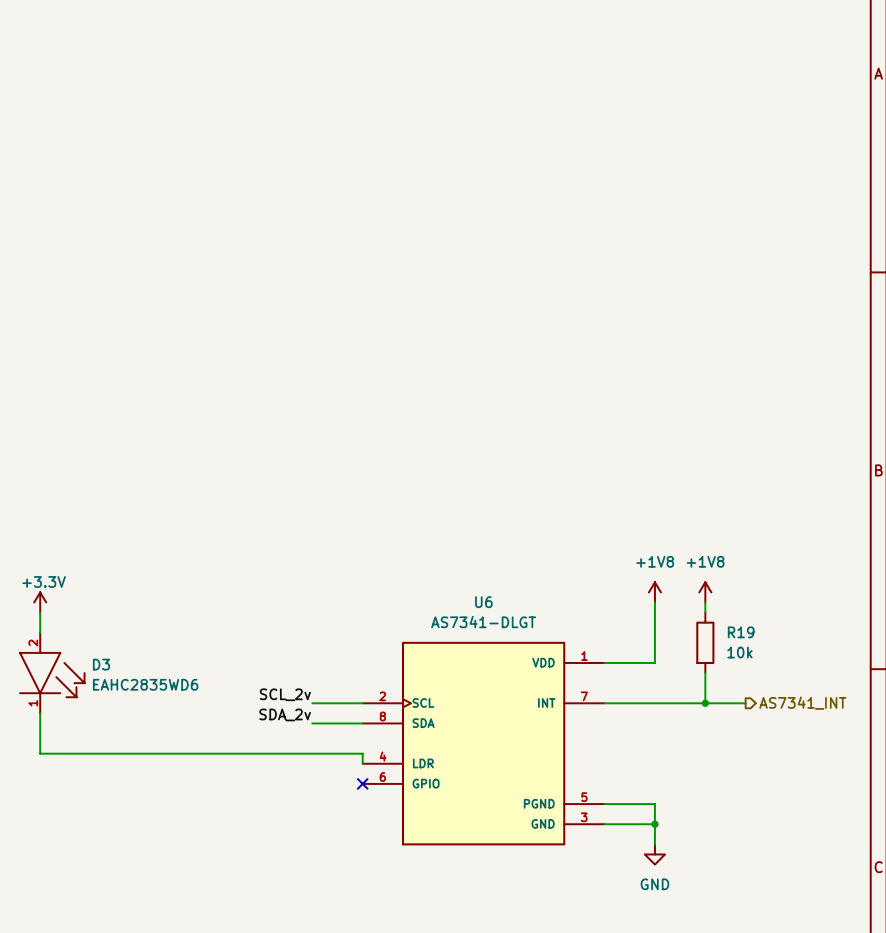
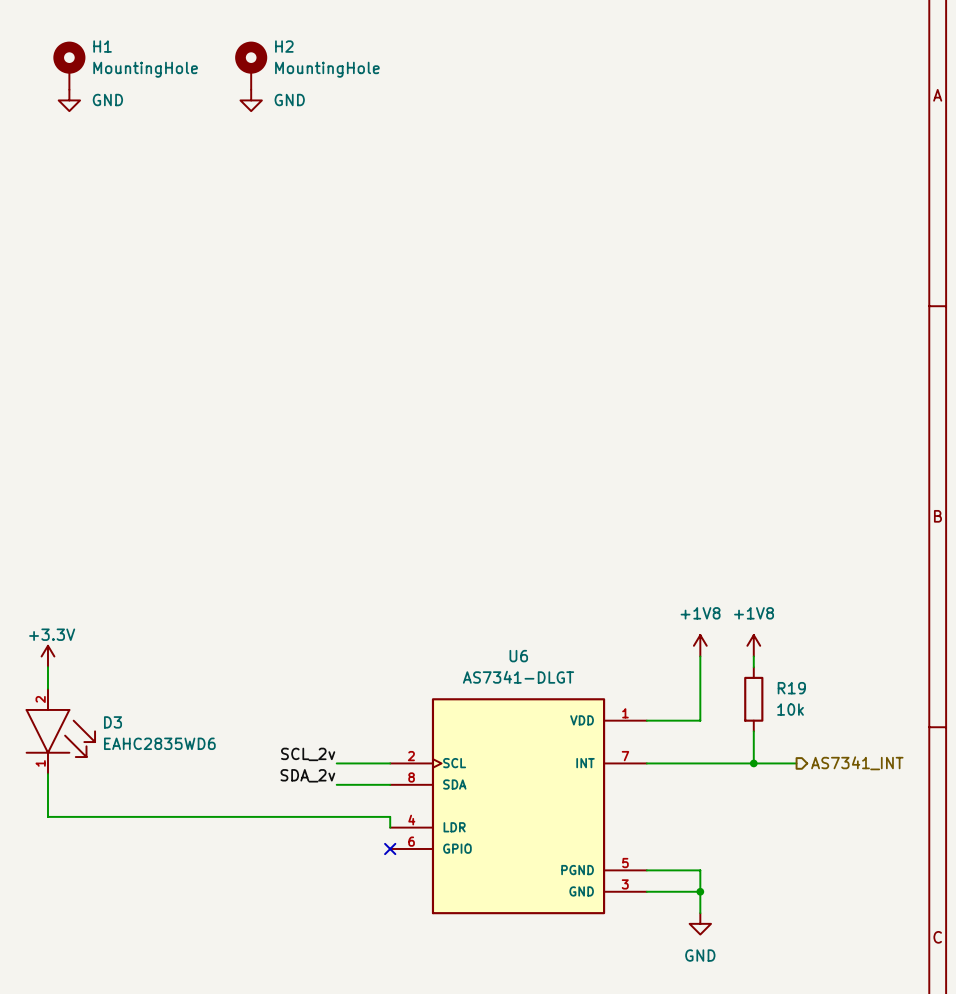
H1: none -> MountingHole (69, 65)
H2: none -> MountingHole (251, 65)
power symbol: none -> GND (69, 100)
power symbol: none -> GND (251, 100)

